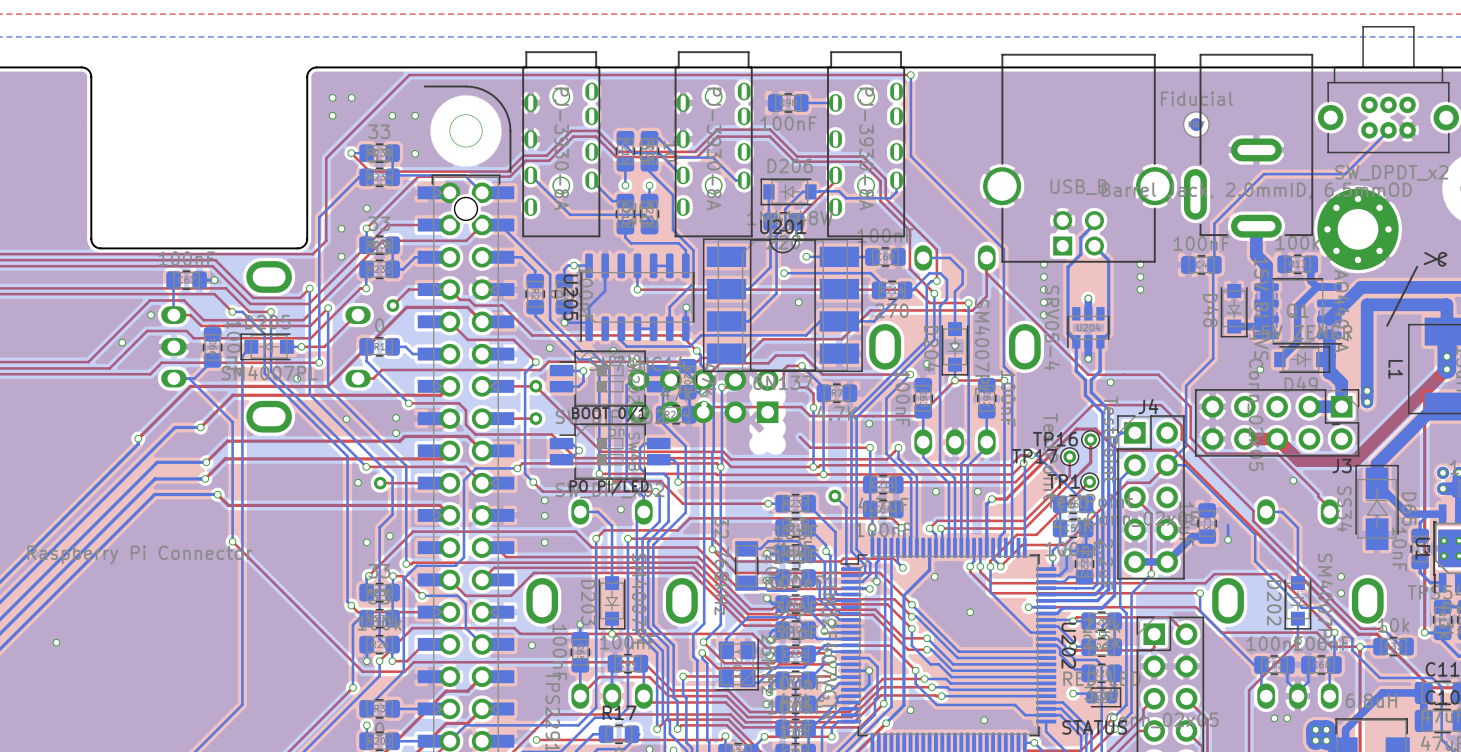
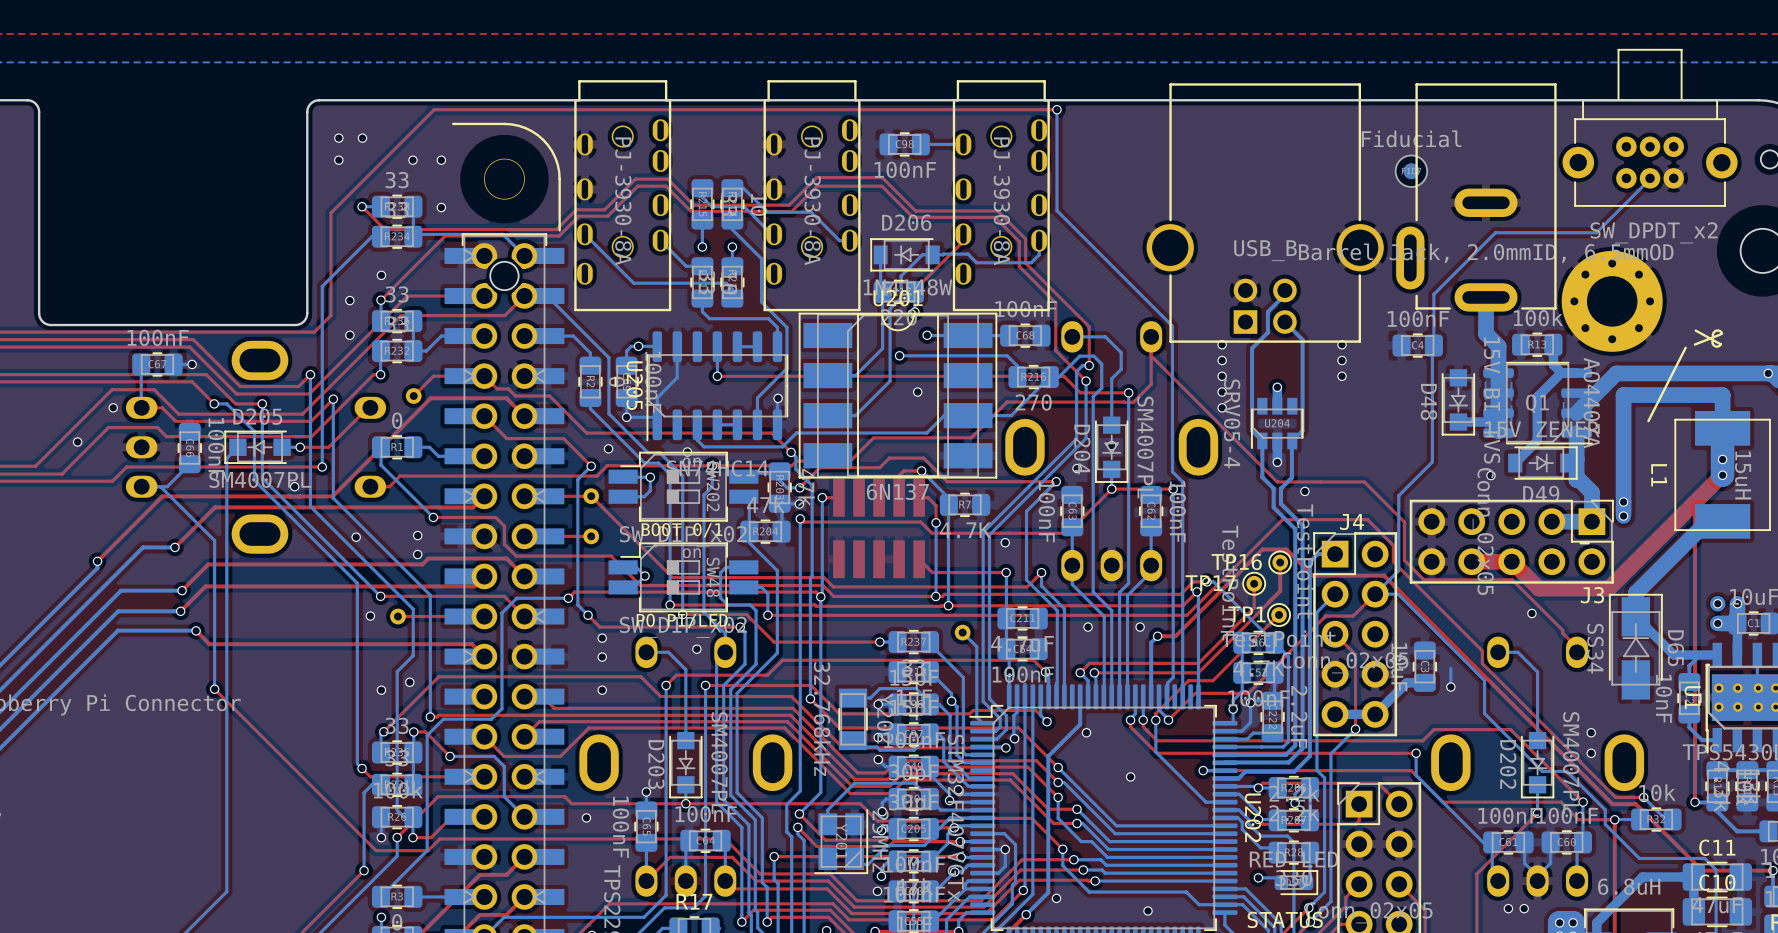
part: (703, 396) -> none
part: none -> (879, 528)

